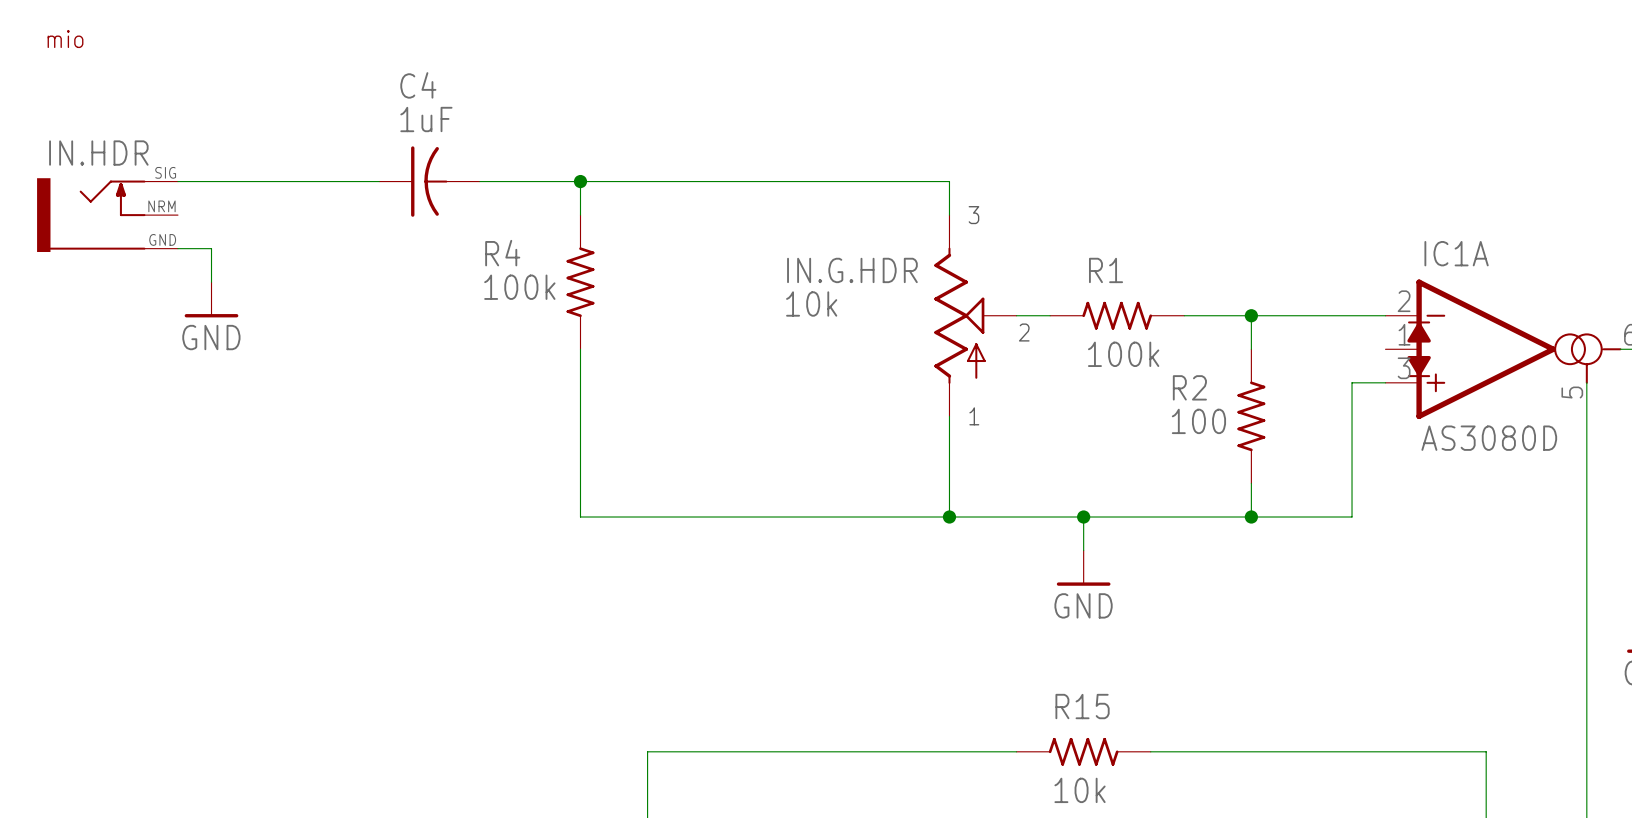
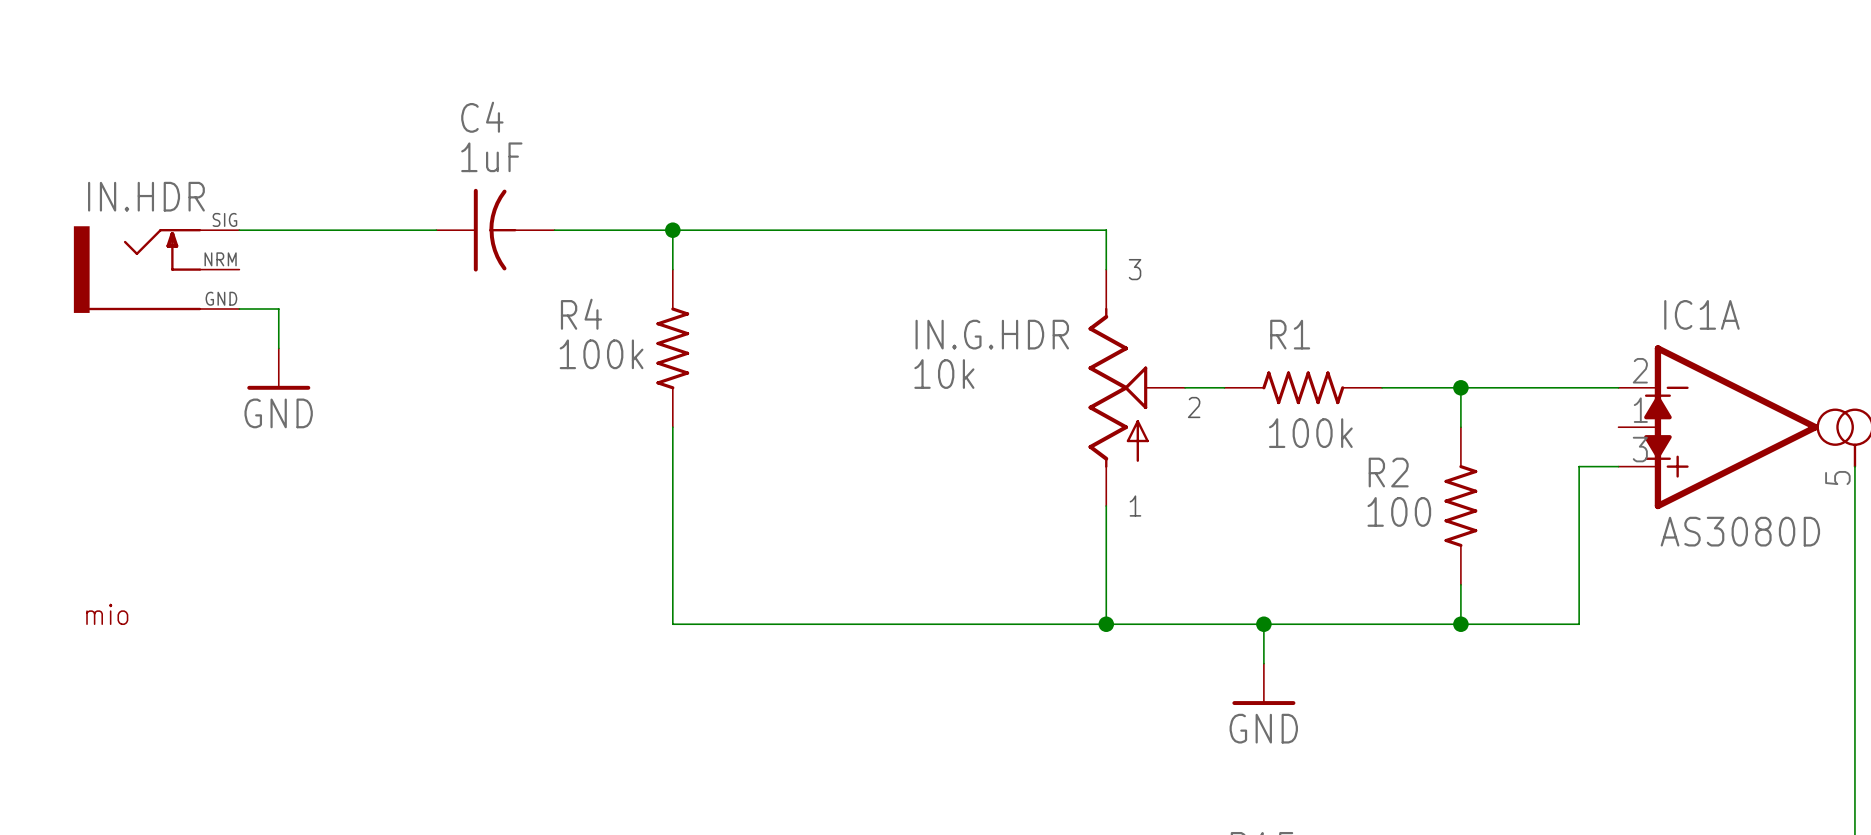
part: (65, 38) -> none
IN.HDR position: (107, 215) -> (156, 269)
wire: (177, 248) (211, 248) (211, 282) -> (239, 308) (278, 308) (278, 348)
power symbol position: GND (211, 299) -> GND (278, 369)
part: none -> (107, 614)

